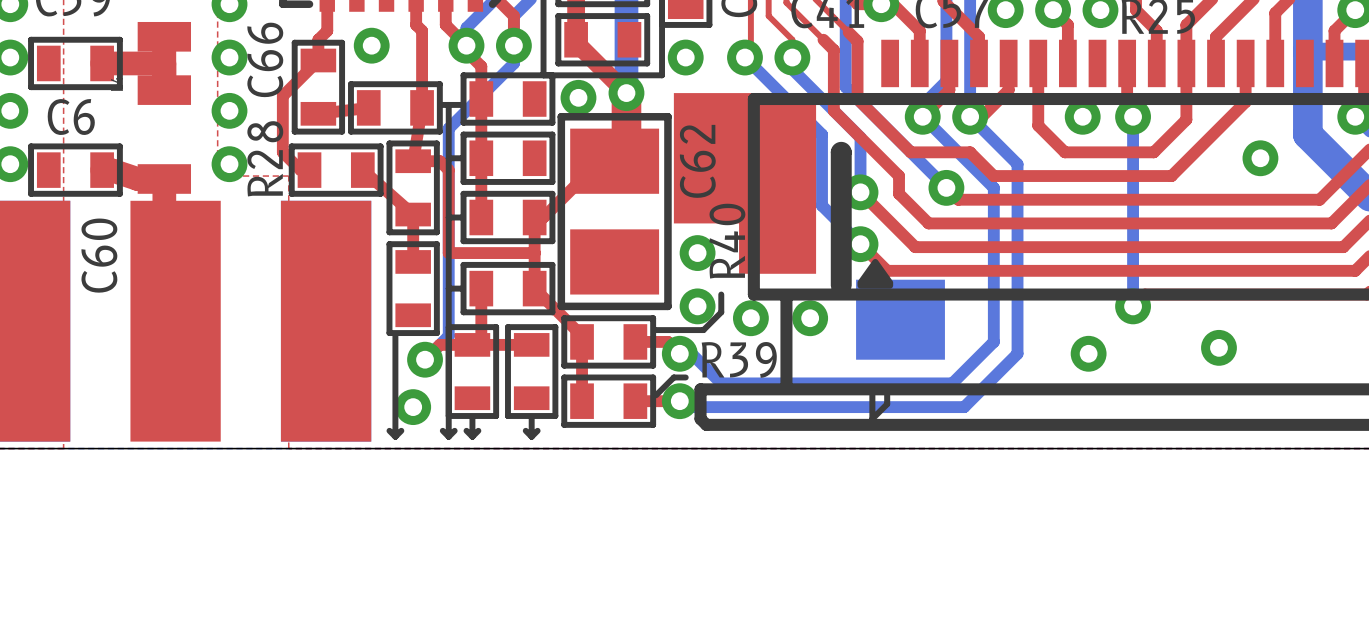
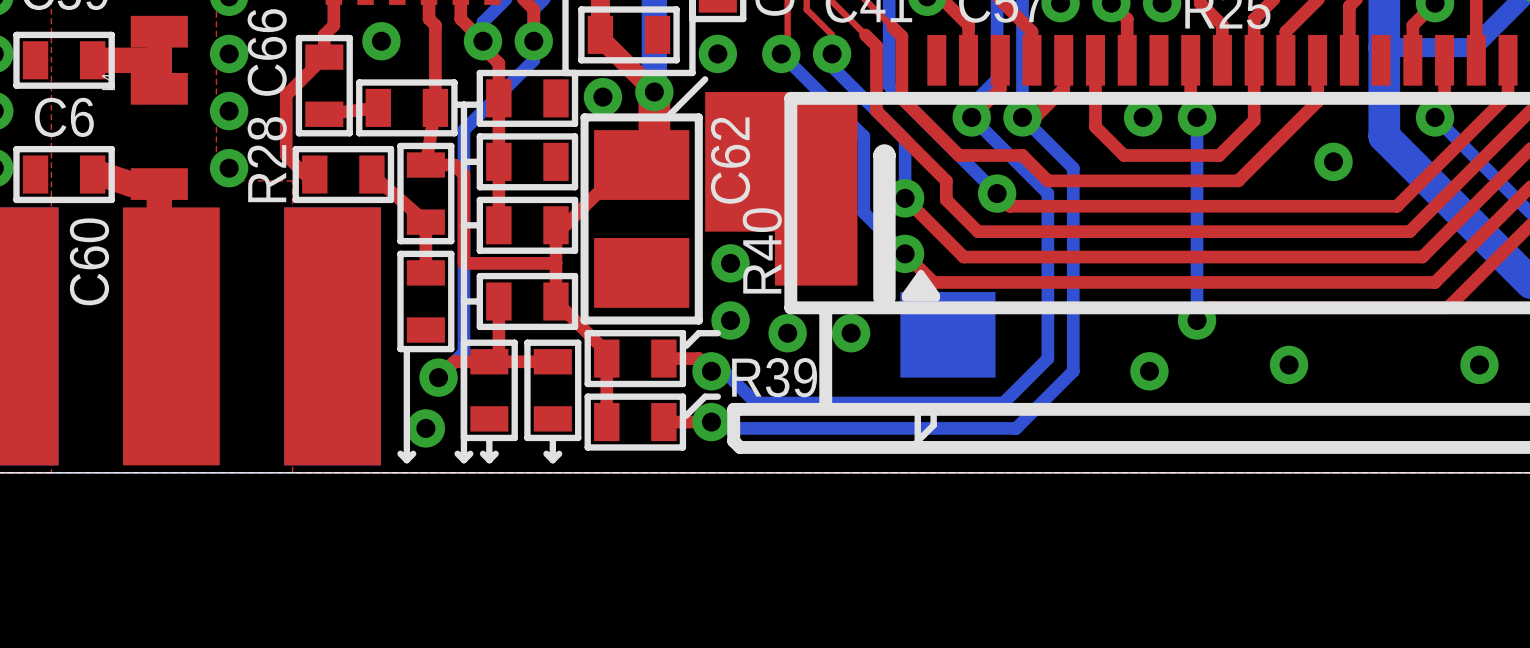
line: none -> (705, 79) (667, 117)
line: (721, 294) (721, 312) (703, 330) (656, 330) -> (717, 333) (698, 333) (686, 345)

